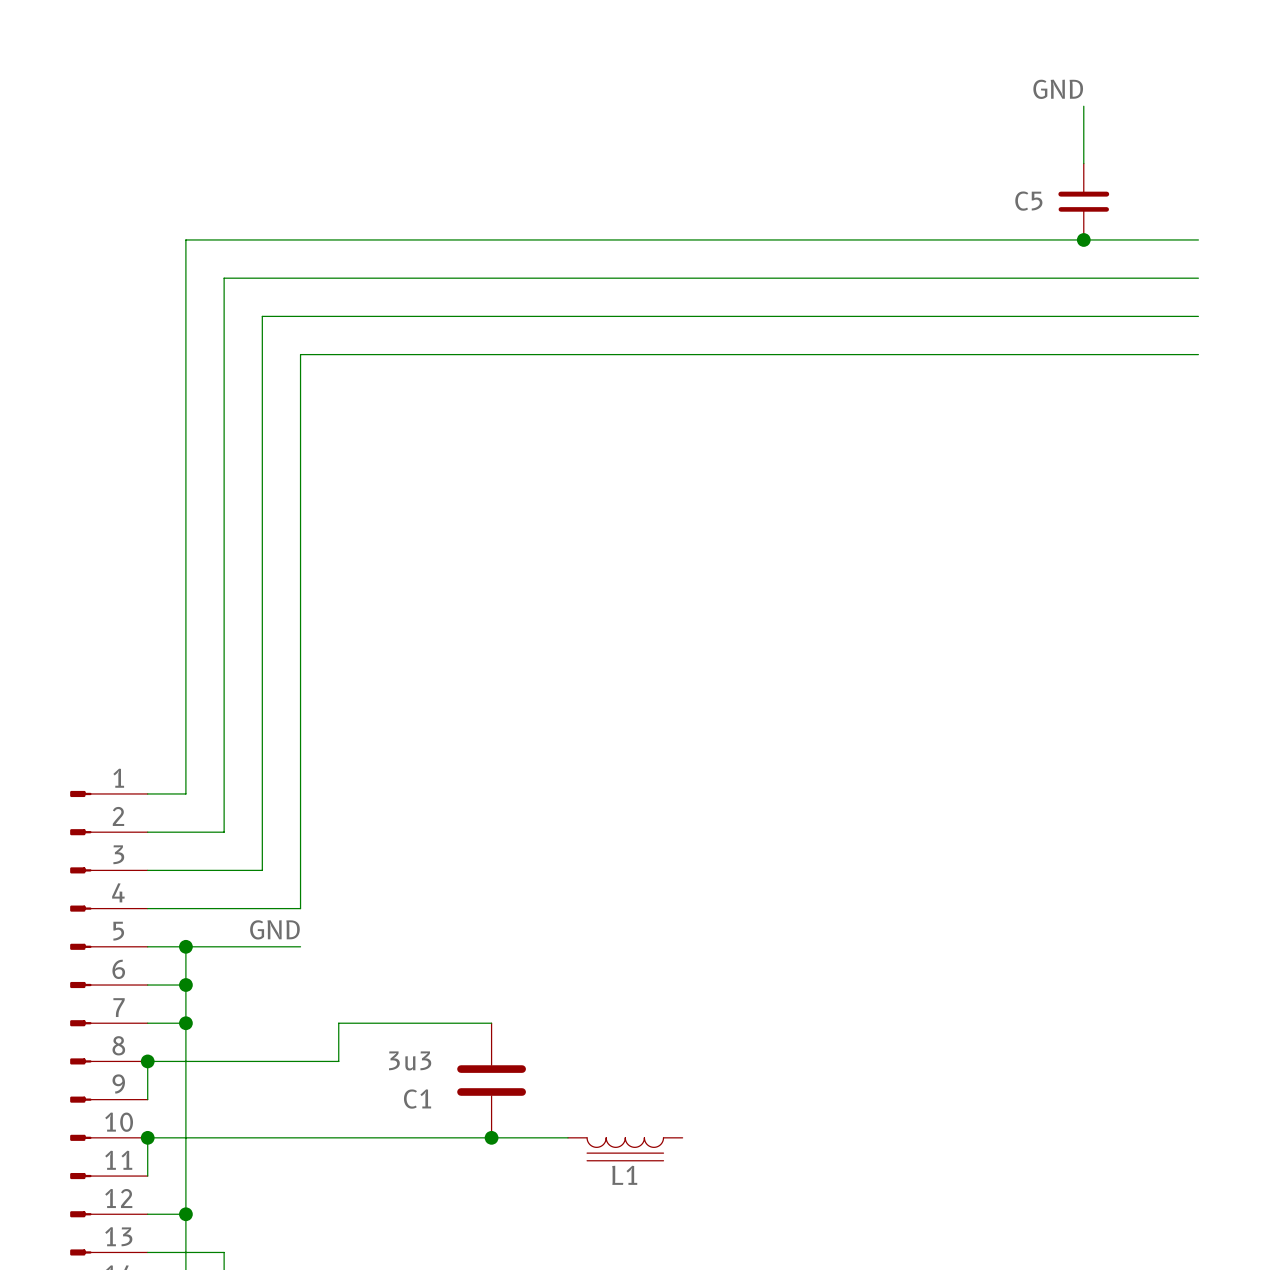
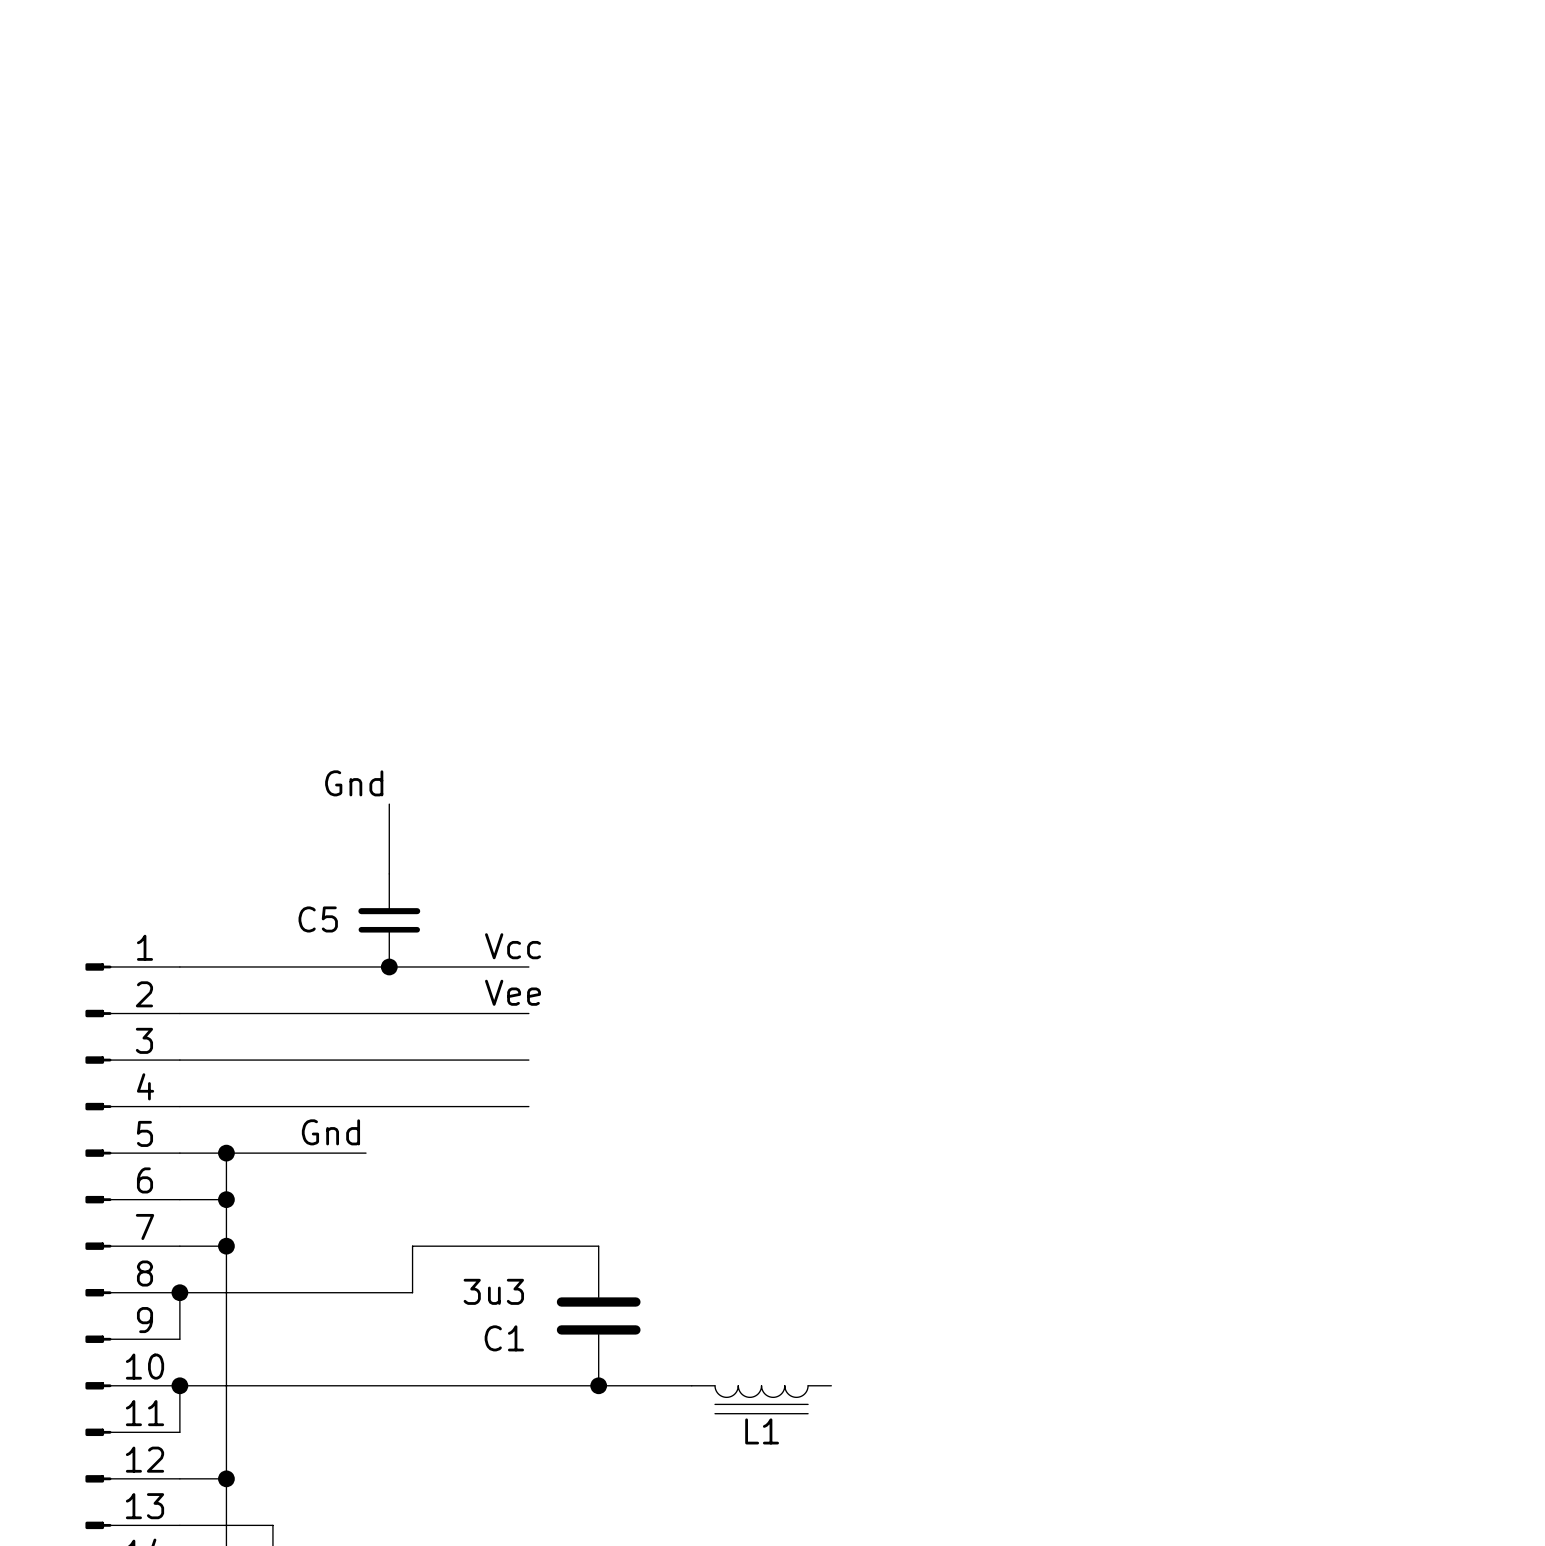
label: GND (1058, 89) -> none
wire: (1083, 106) (1083, 163) -> none
C5 position: (1083, 201) -> (389, 920)
junction: (1083, 239) -> none
wire: (1198, 239) (185, 239) (185, 793) -> (528, 966) (226, 966)
wire: (1198, 278) (224, 278) (224, 832) -> (528, 1013) (272, 1013)
wire: (1198, 316) (262, 316) (262, 870) -> (528, 1060) (319, 1060)
wire: (1198, 354) (300, 354) (300, 908) -> (528, 1106) (366, 1106)
label: none -> Gnd (354, 783)
wire: none -> (389, 804) (389, 873)
label: none -> Vcc (513, 946)
junction: none -> (389, 966)
label: none -> Vee (513, 992)
label: GND (274, 929) -> Gnd (330, 1132)

